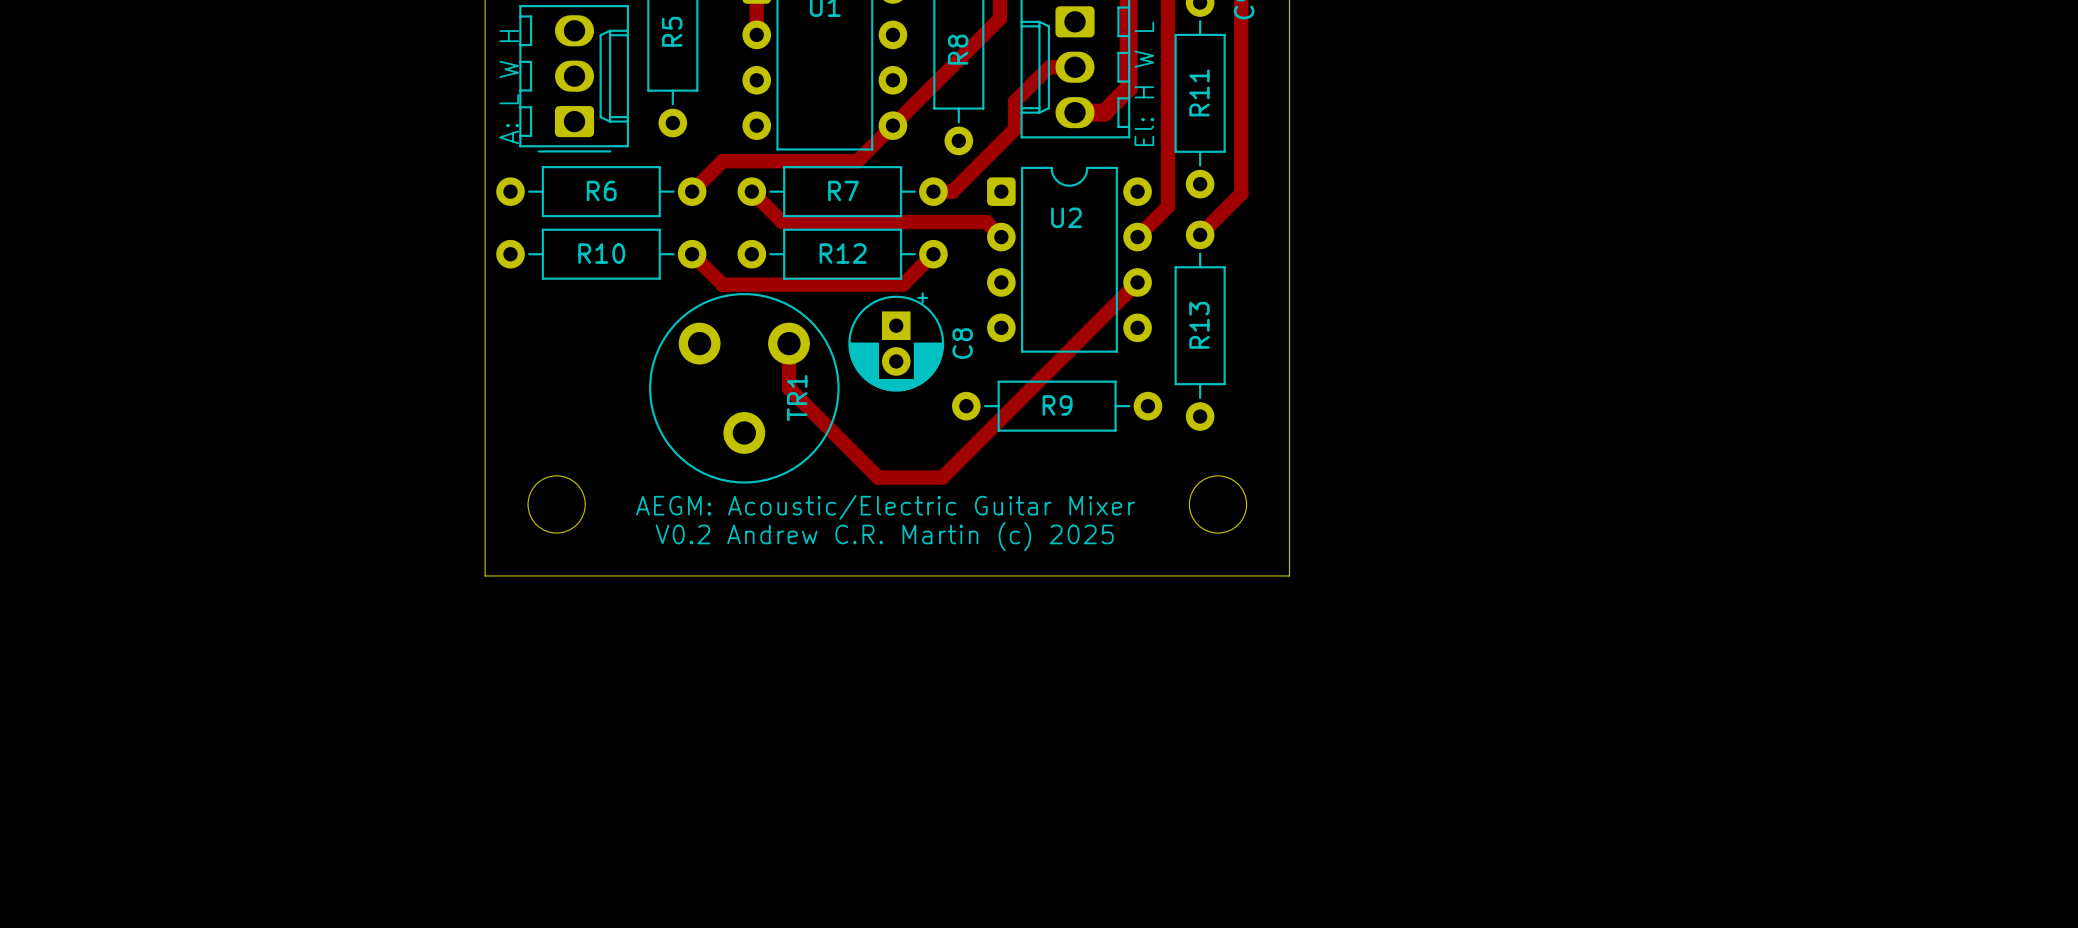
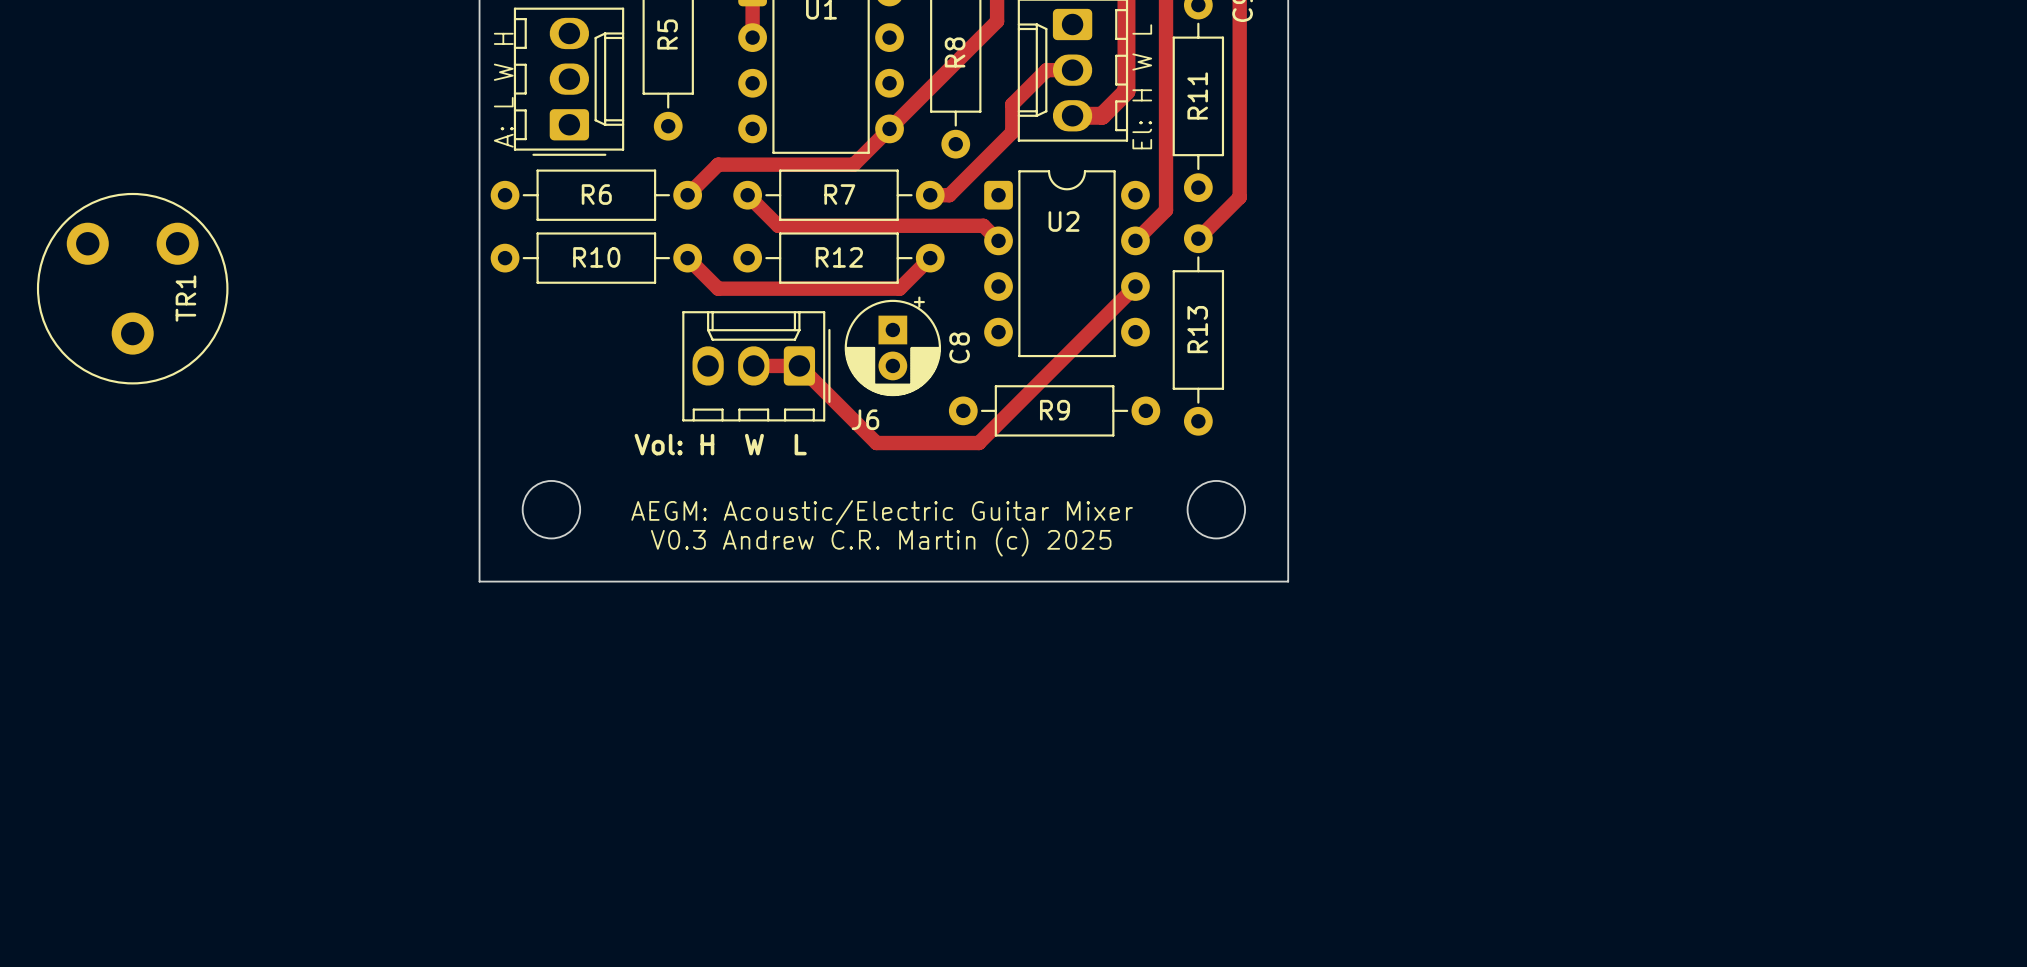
track: (789, 343) (789, 388) (878, 477) (942, 477) (981, 438) -> (753, 365) (799, 365) (876, 443) (978, 443)
J6: none -> (756, 366)
TR1 position: (744, 388) -> (132, 288)
text: none -> Vol: H W L (720, 444)
text: V0.2 Andrew C.R. Martin (c) 2025 (884, 536) -> V0.3 Andrew C.R. Martin (c) 2025 (881, 541)

